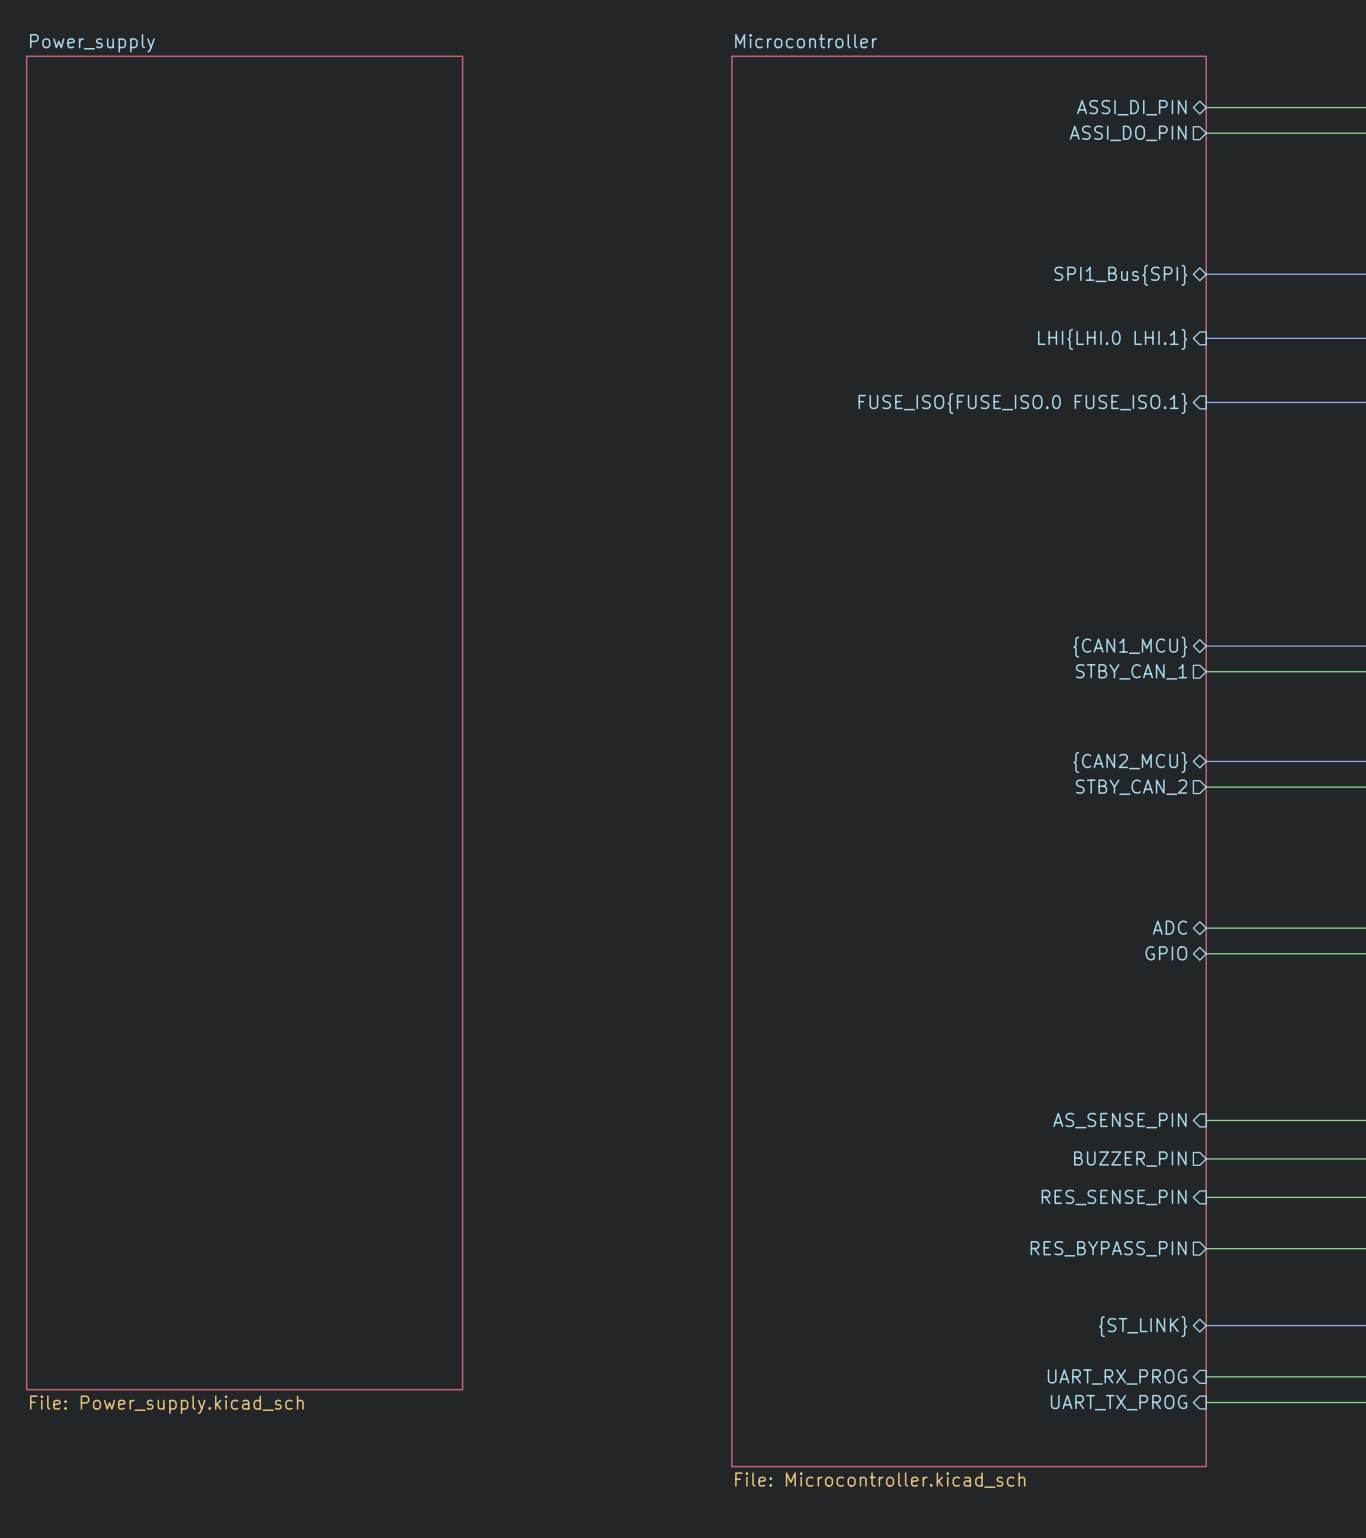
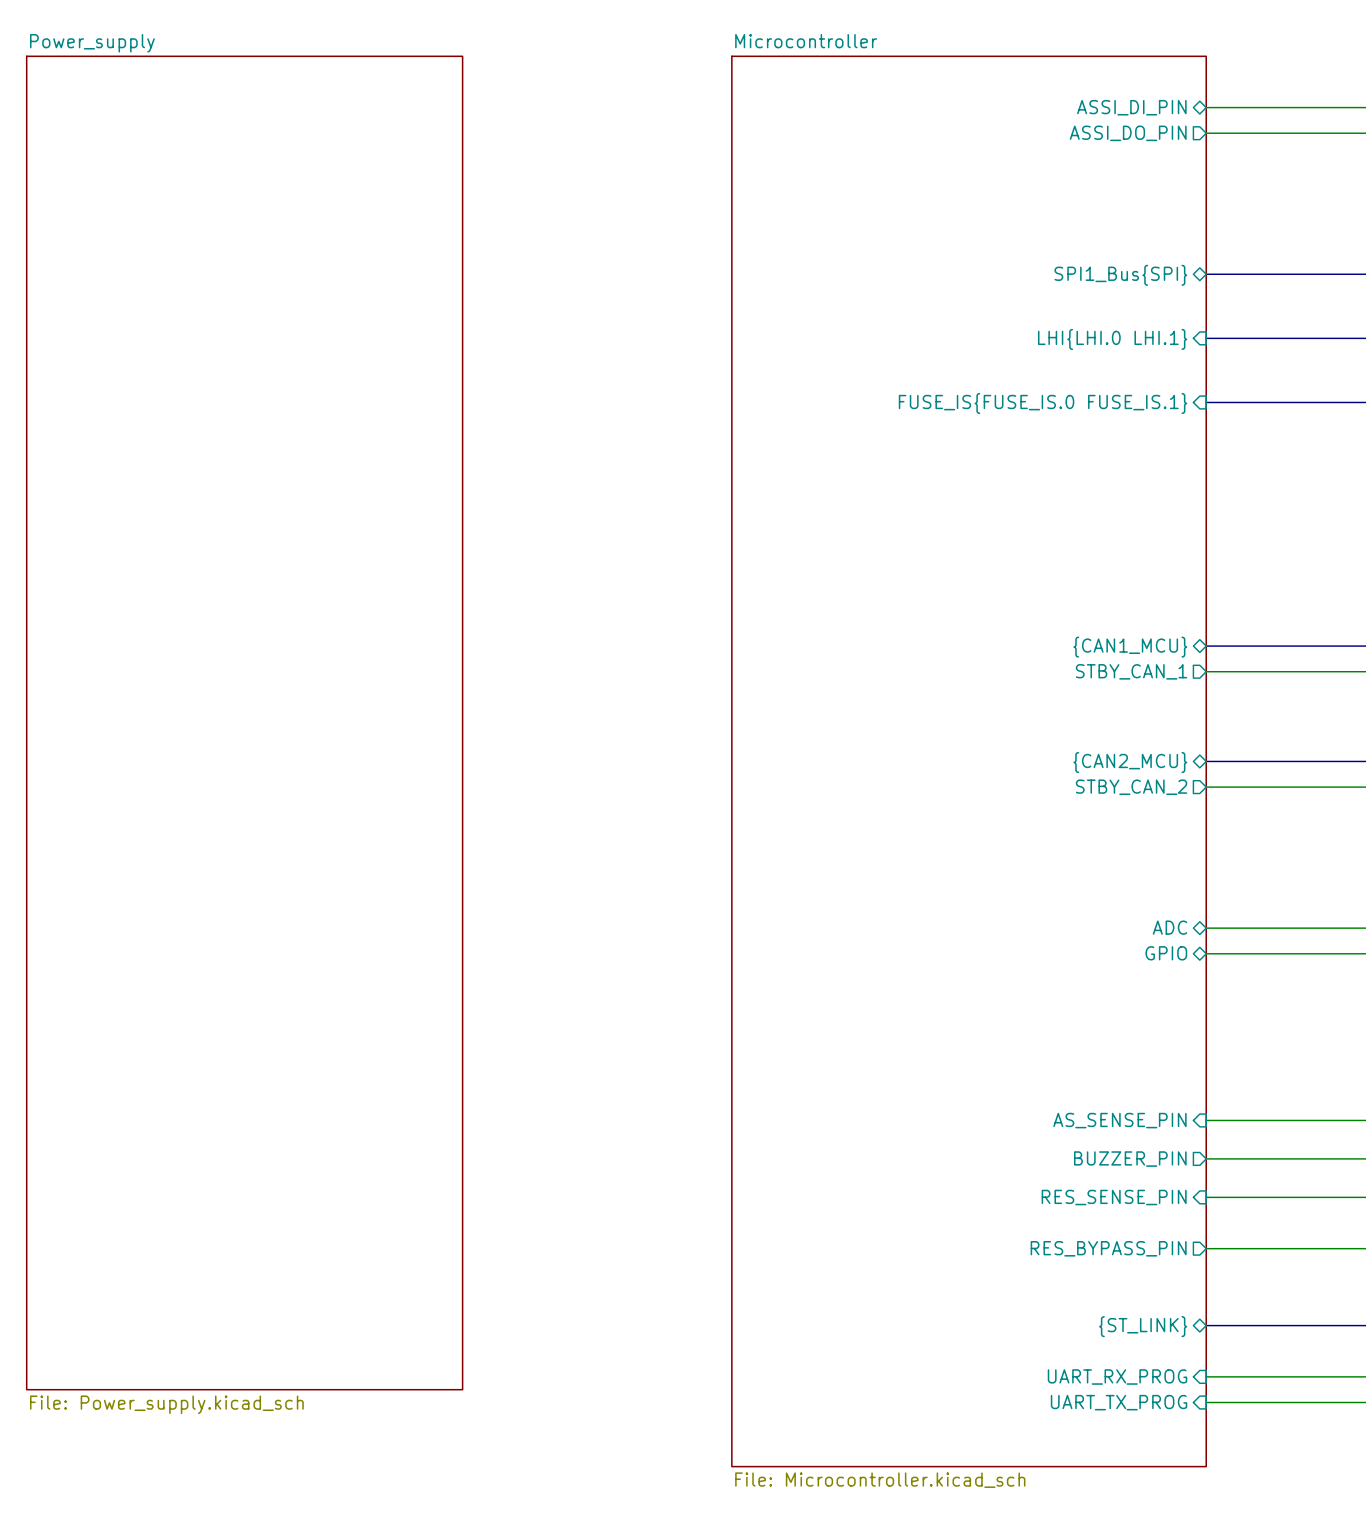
sheet pin: FUSE_ISO{FUSE_ISO.0 FUSE_ISO.1} (1022, 403) -> FUSE_IS{FUSE_IS.0 FUSE_IS.1} (1043, 403)

